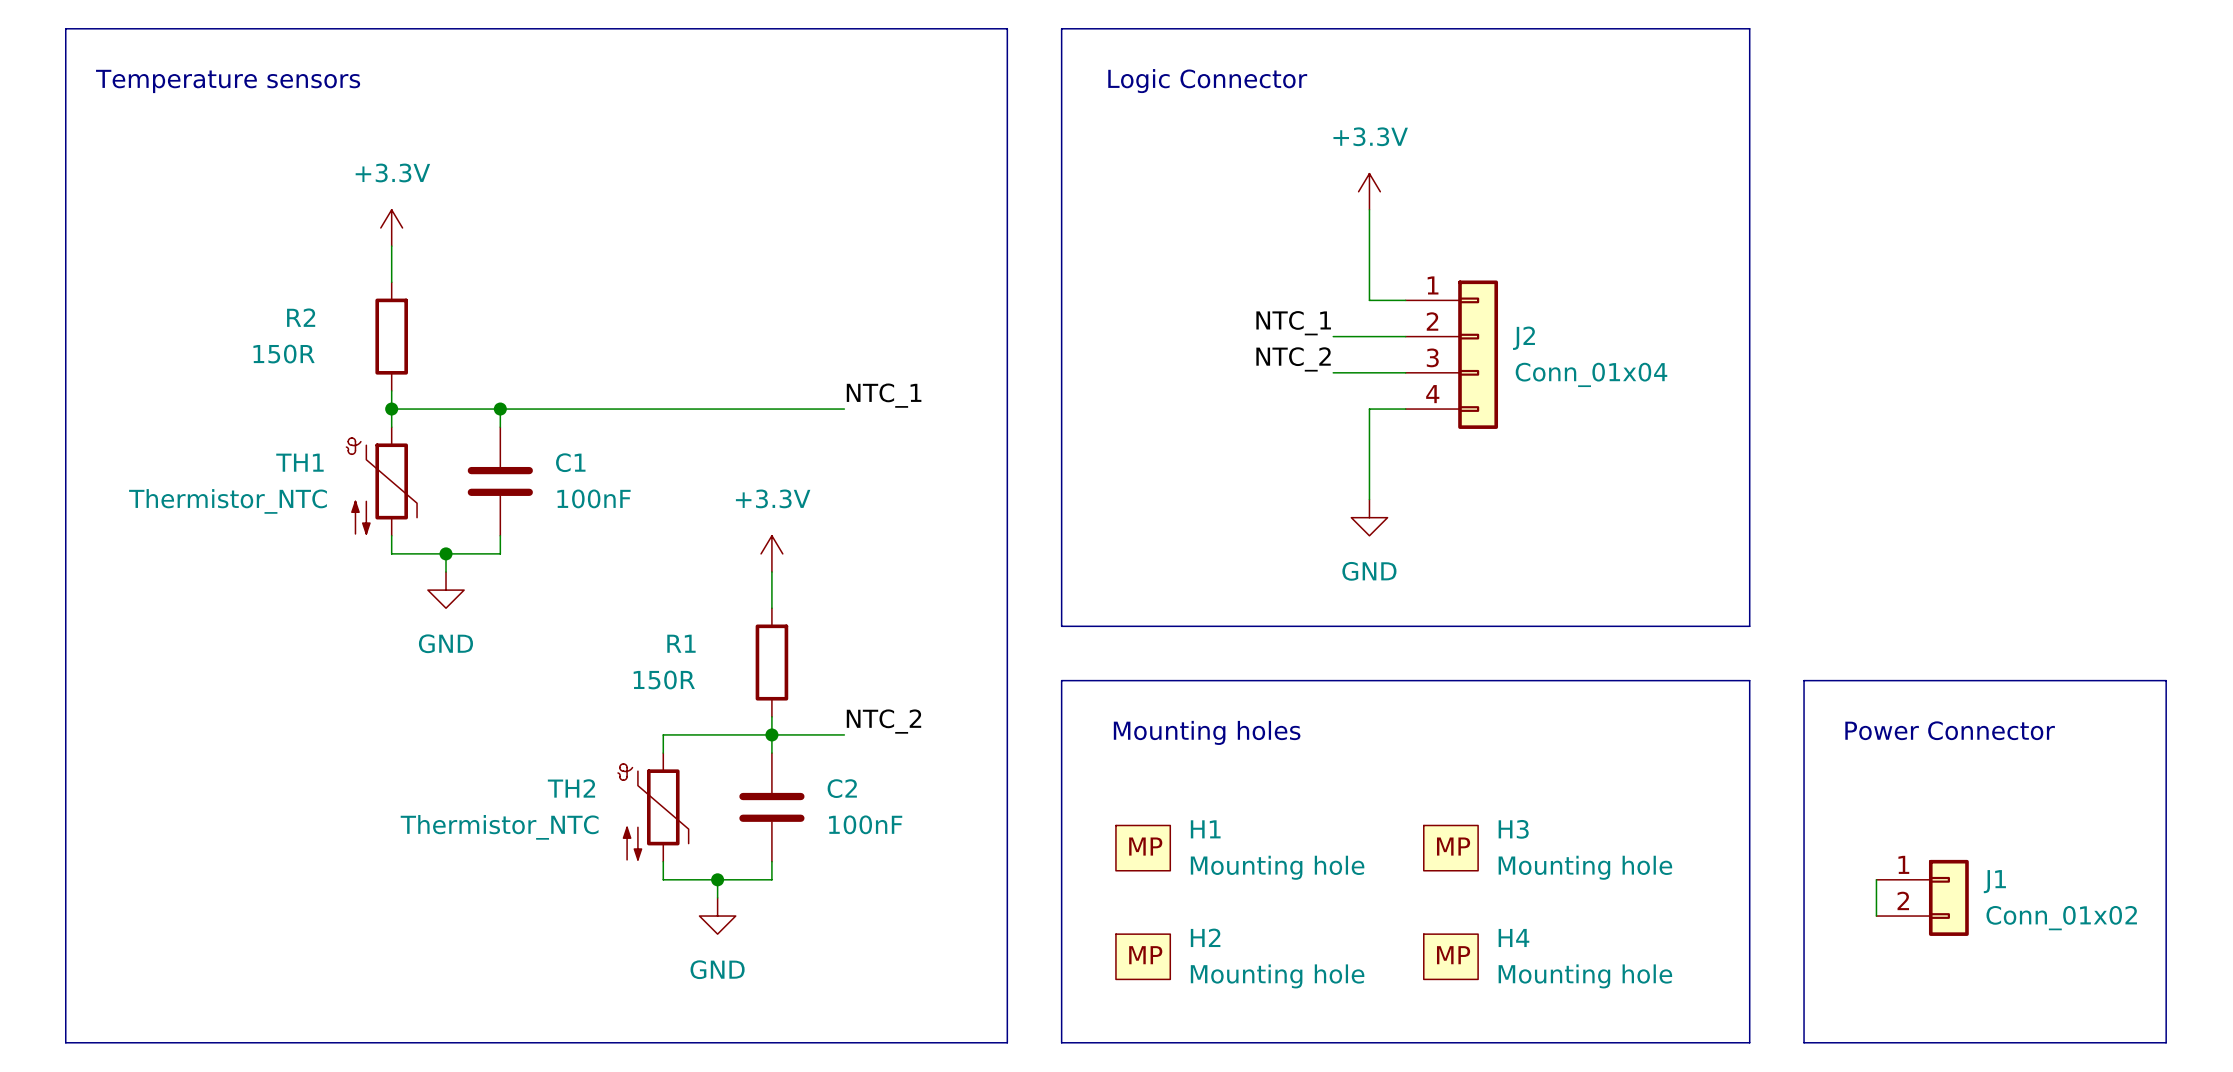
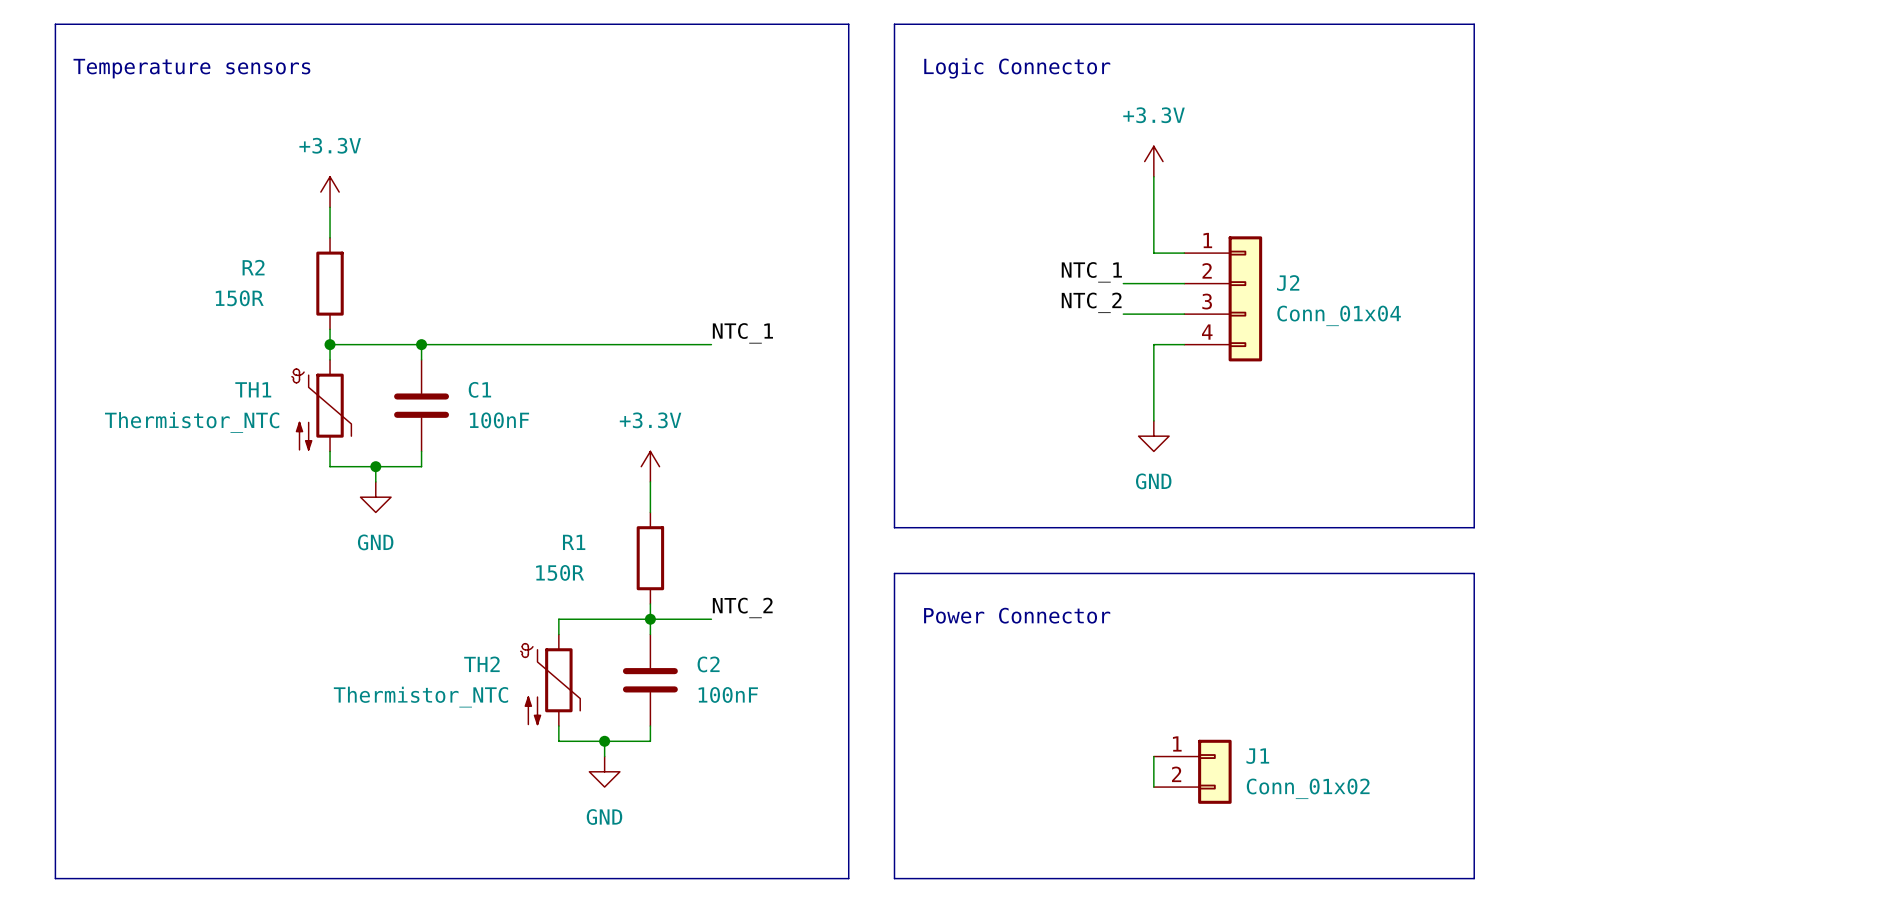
line: (1804, 680) (2166, 680) (2166, 1042) (1804, 1042) (1804, 680) -> none
text: Power Connector (1950, 730) -> none
text: Mounting holes (1207, 732) -> Power Connector (1017, 615)
H1: Mounting hole (1143, 848) -> none
H3: Mounting hole (1450, 848) -> none
wire: (1876, 879) (1876, 916) -> none
wire: none -> (1153, 756) (1153, 787)
J1 position: (1922, 897) -> (1192, 771)
H2: Mounting hole (1143, 956) -> none
H4: Mounting hole (1450, 956) -> none

